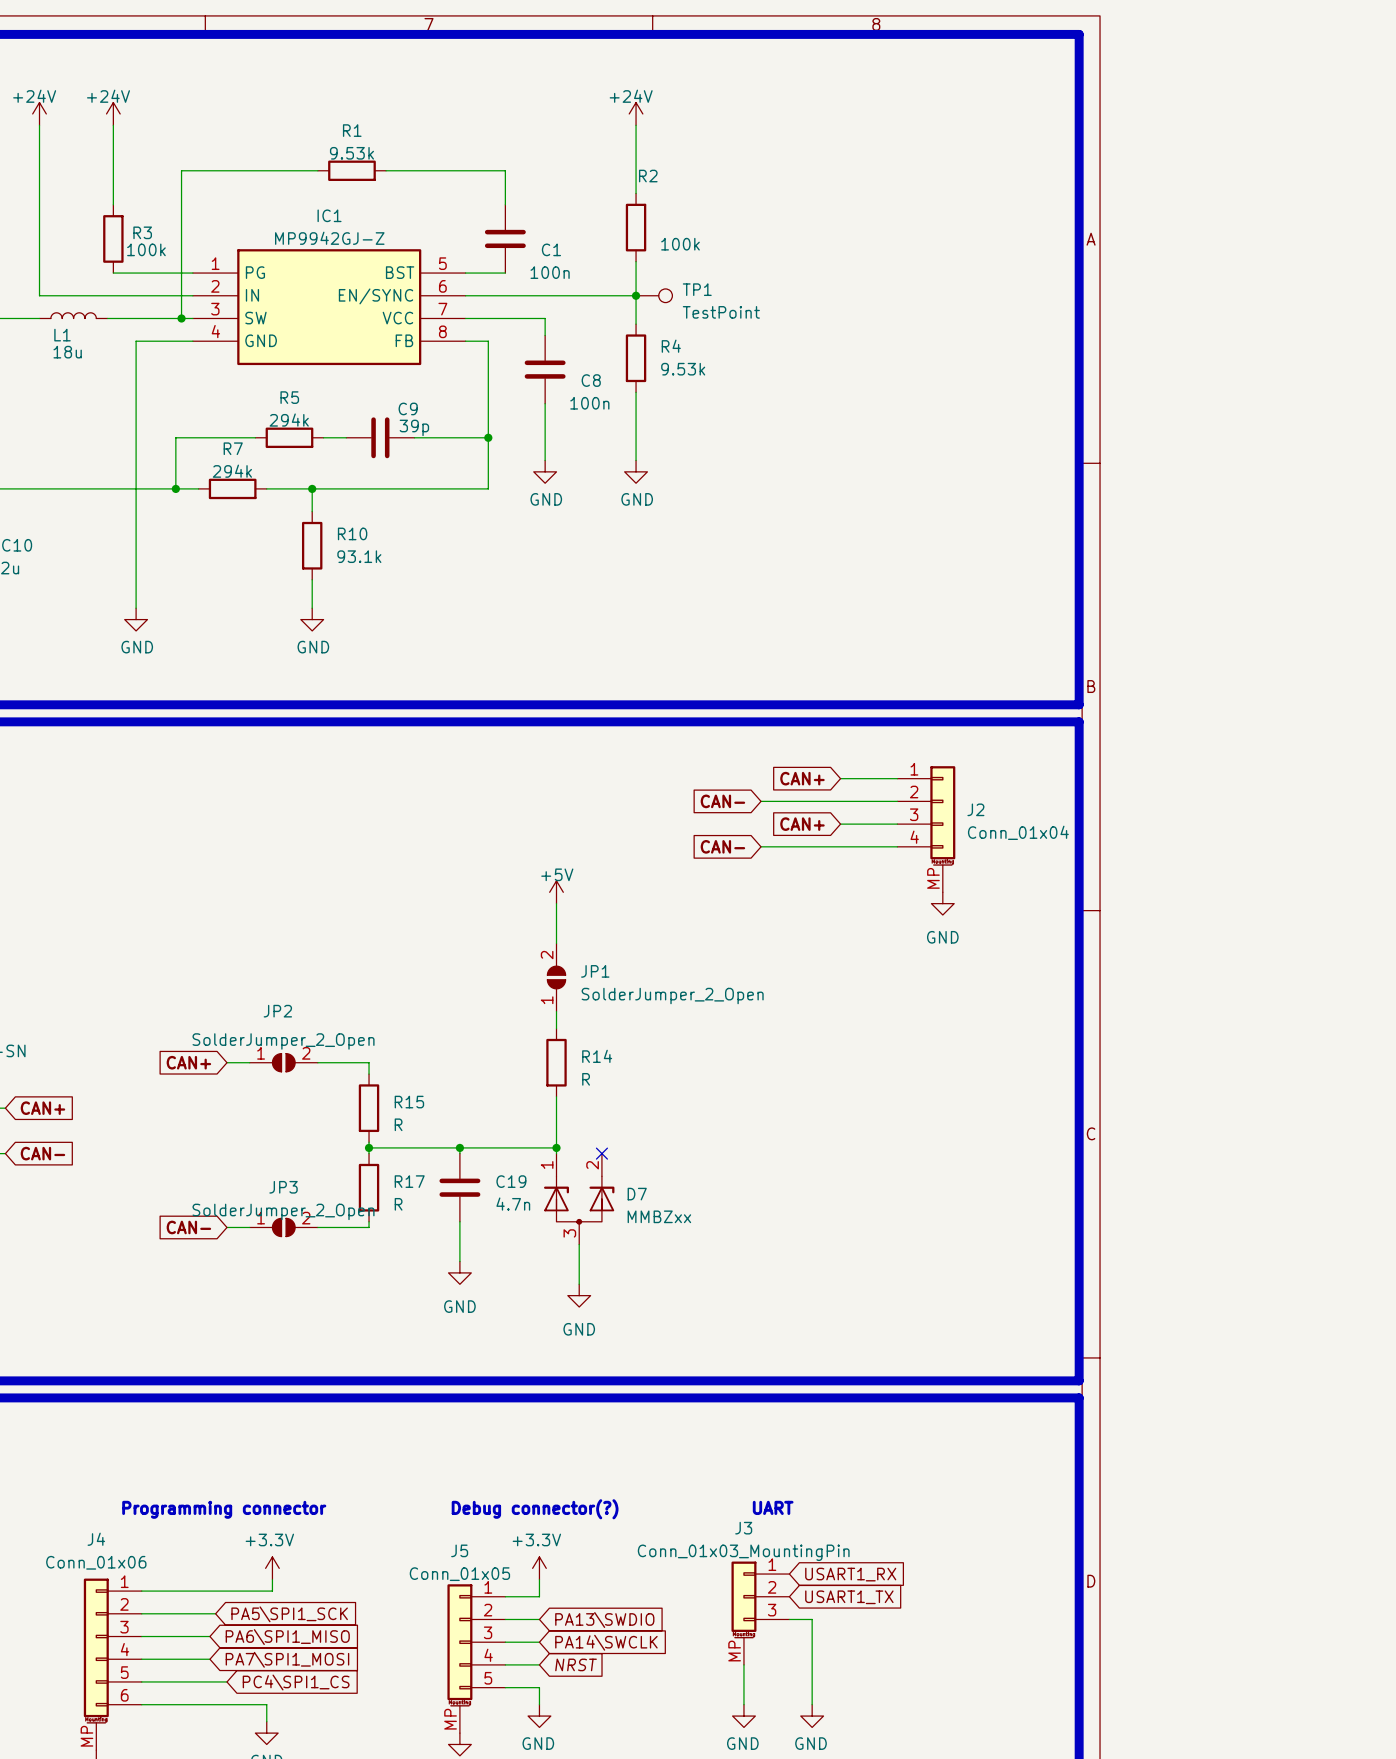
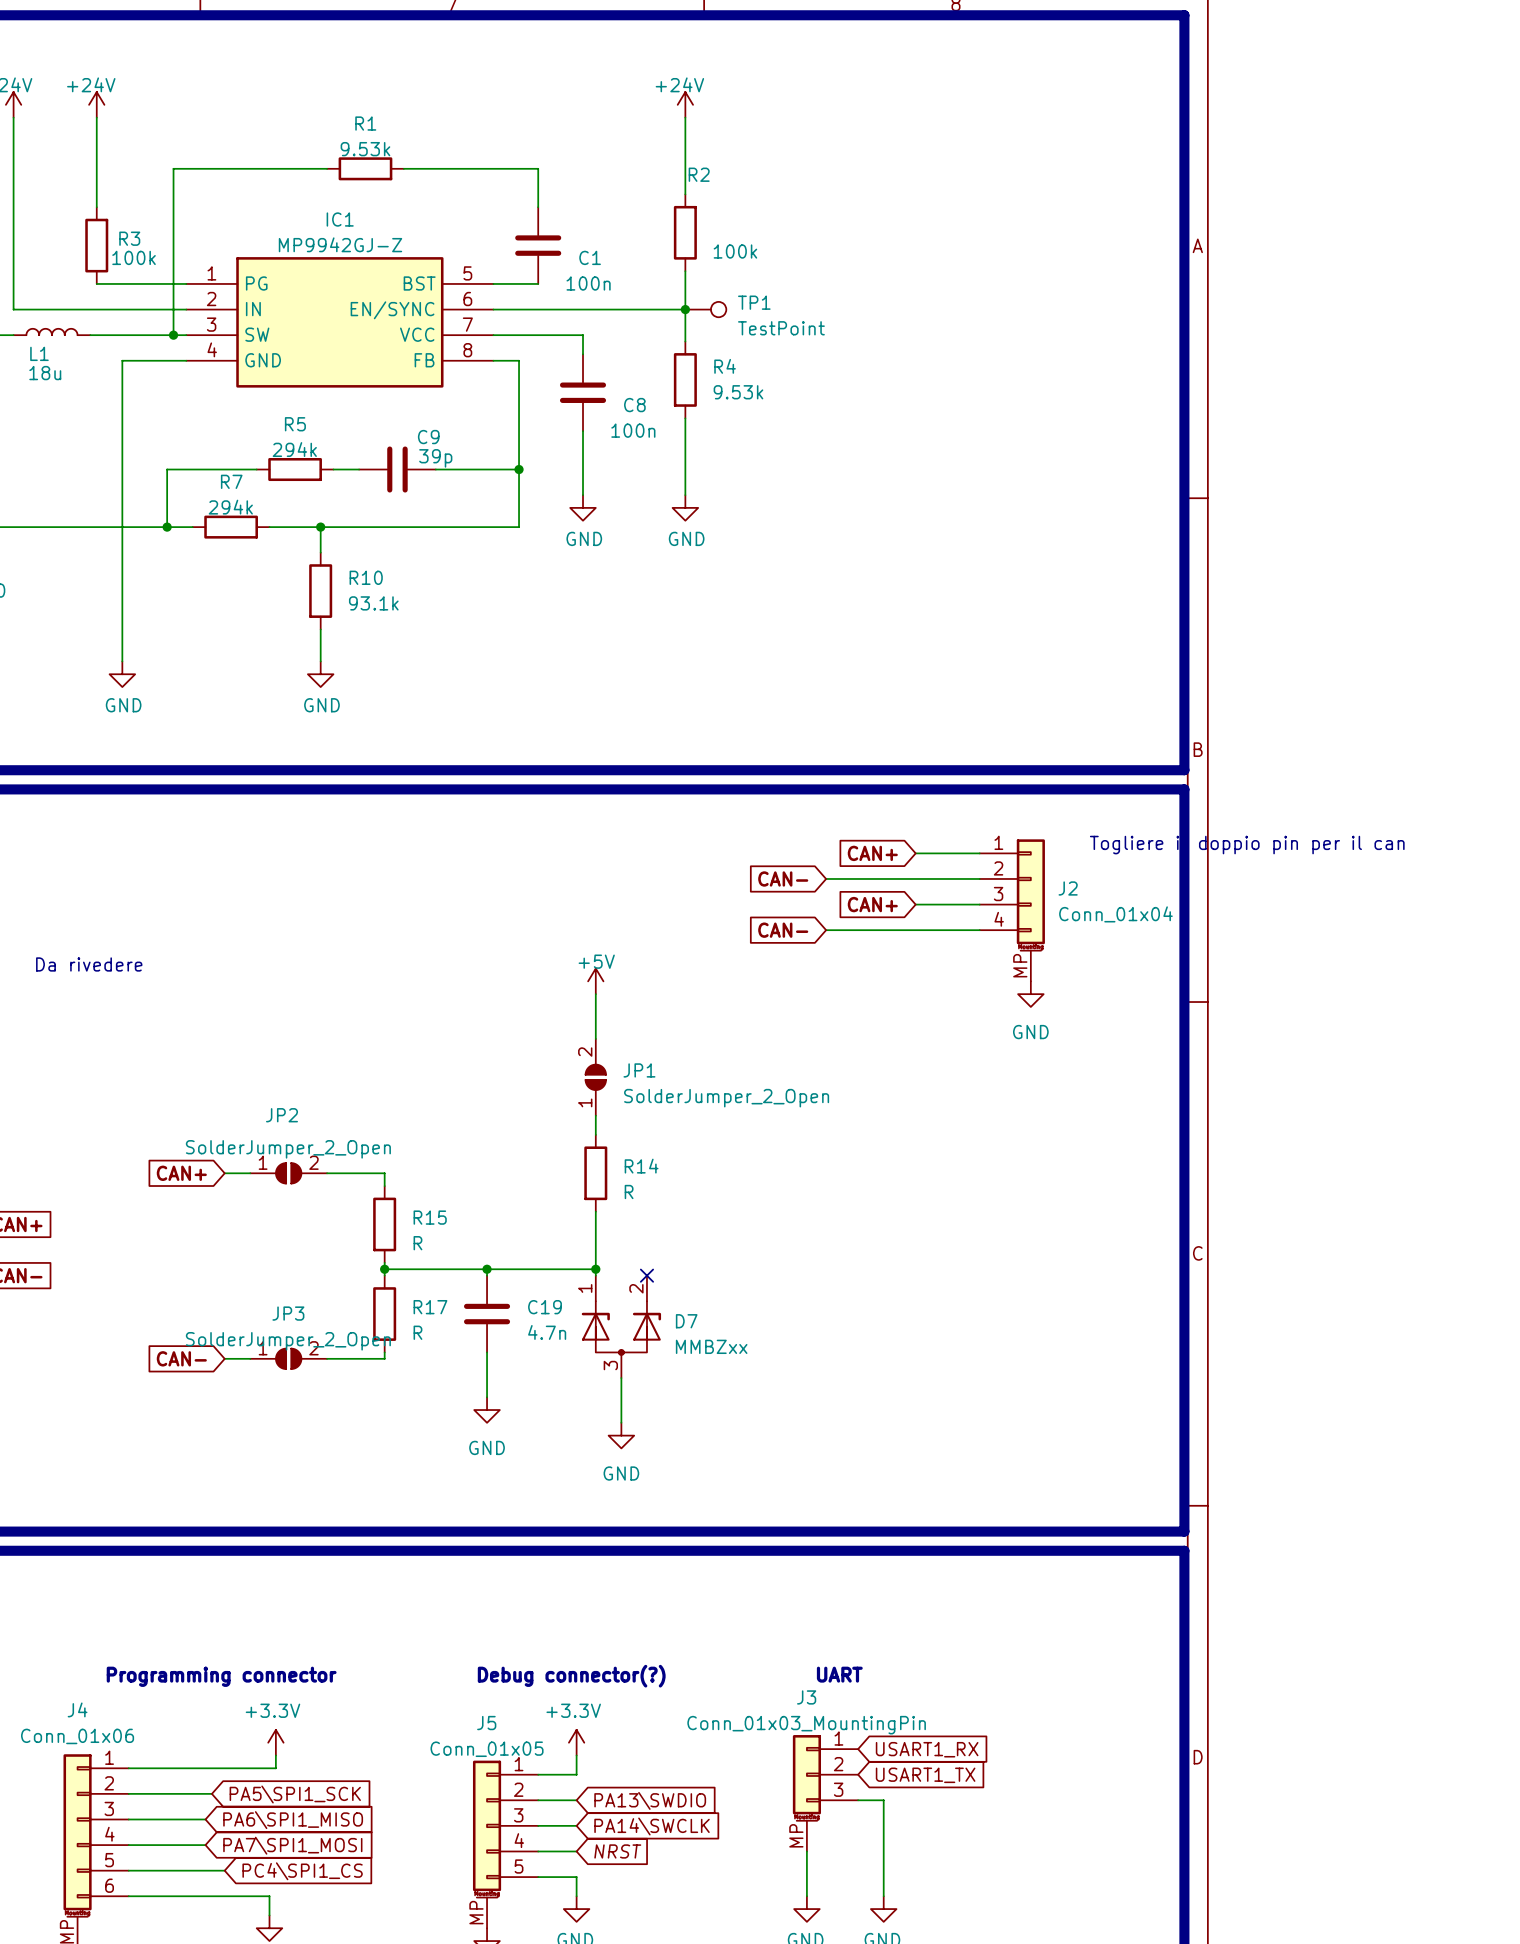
text: none -> Togliere il doppio pin per il can (1247, 845)
text: none -> Da rivedere (89, 964)

